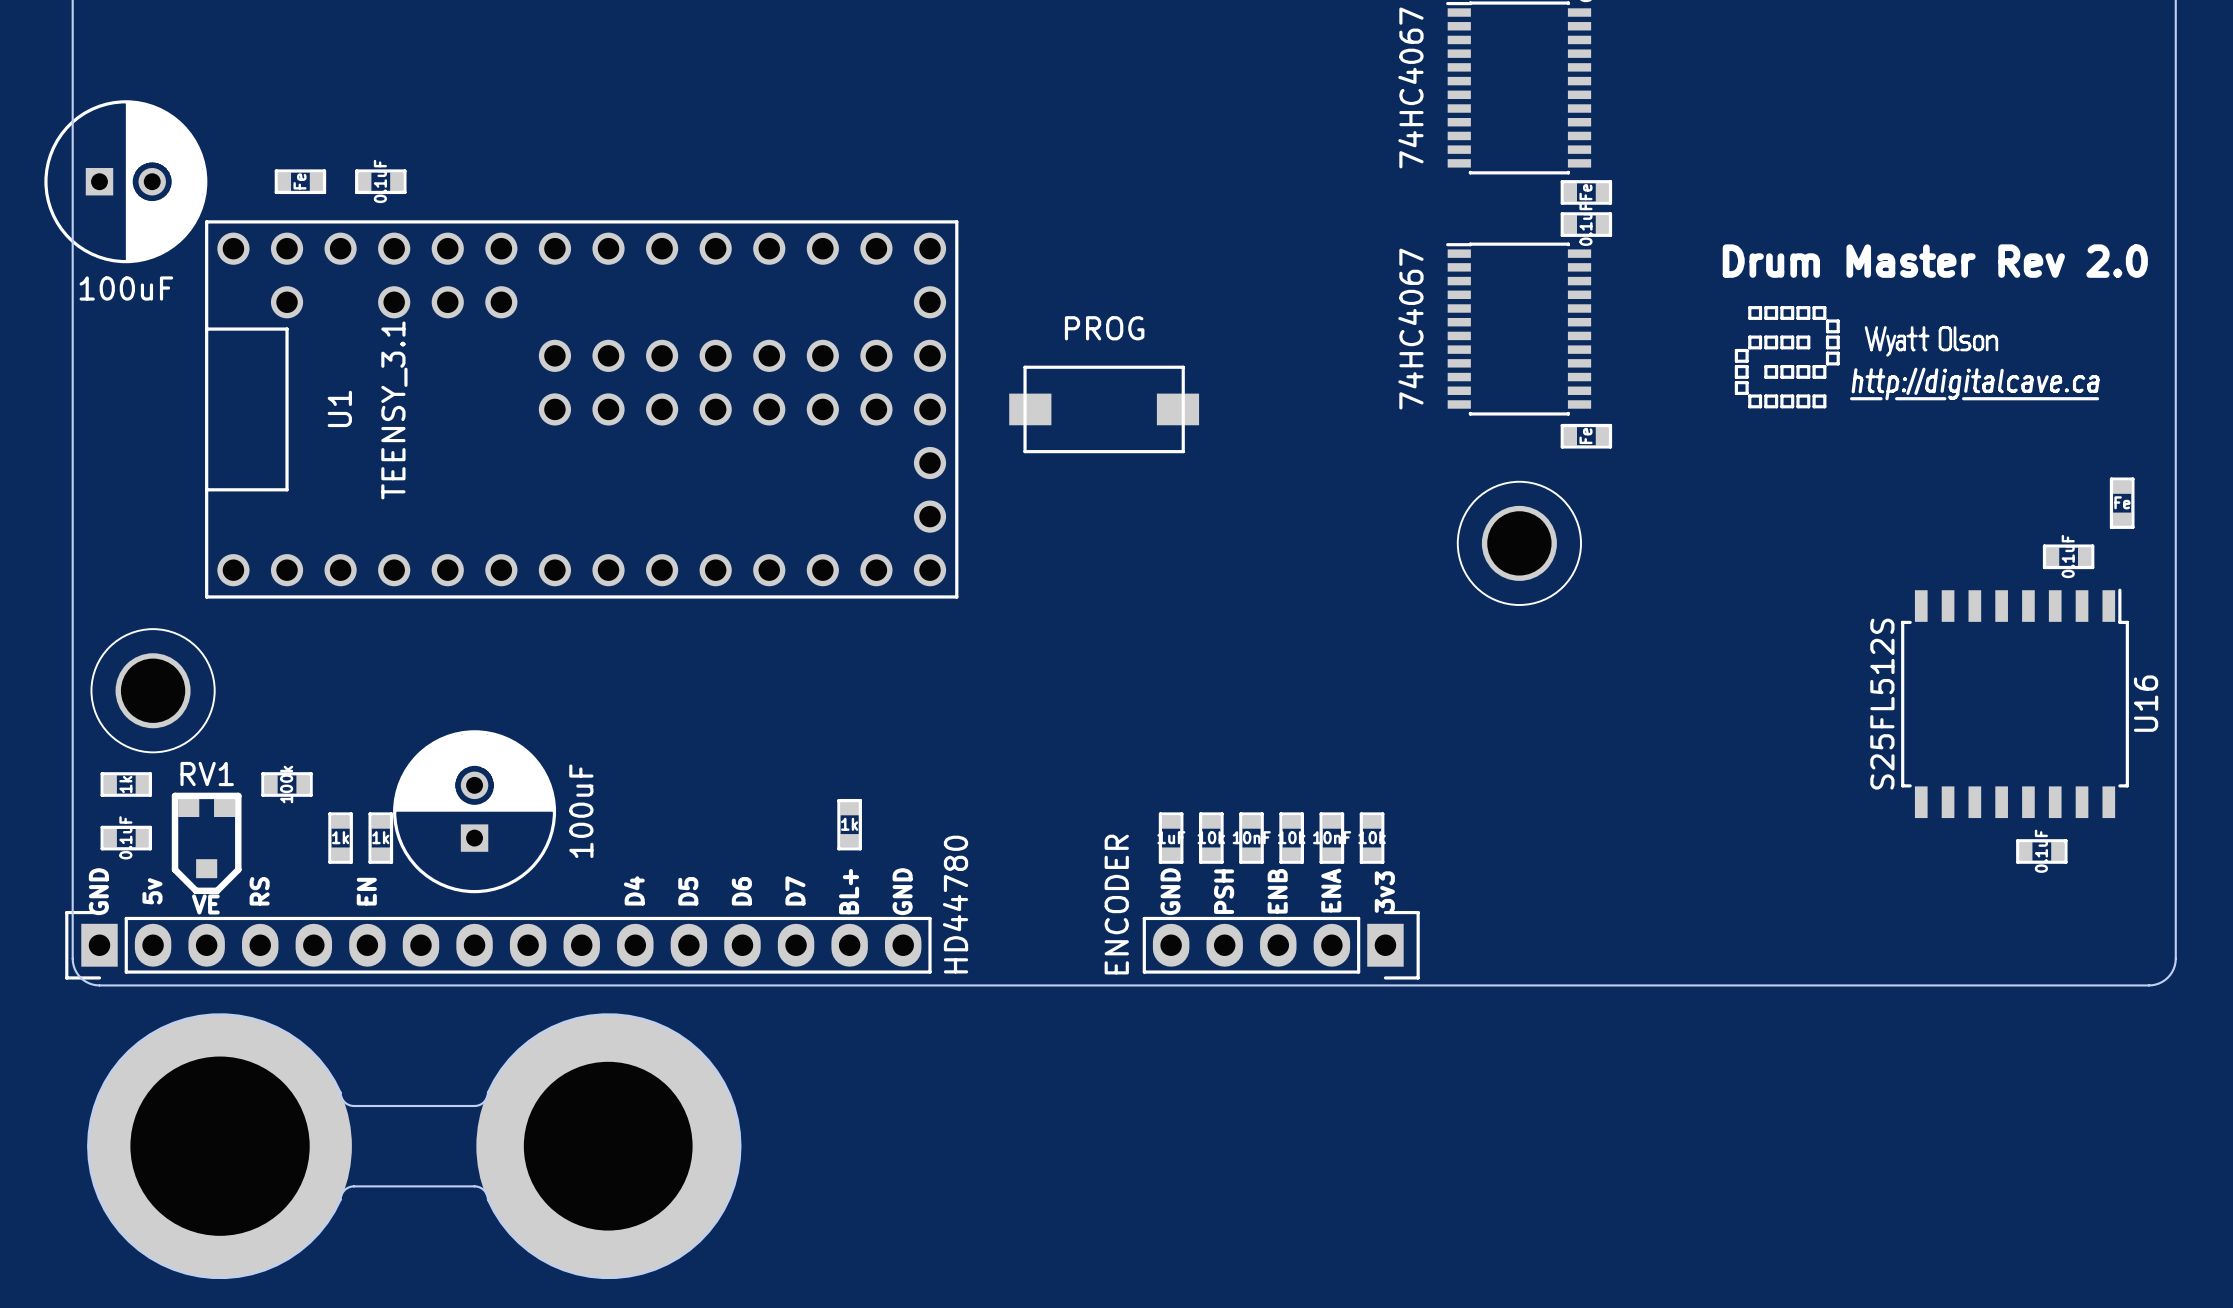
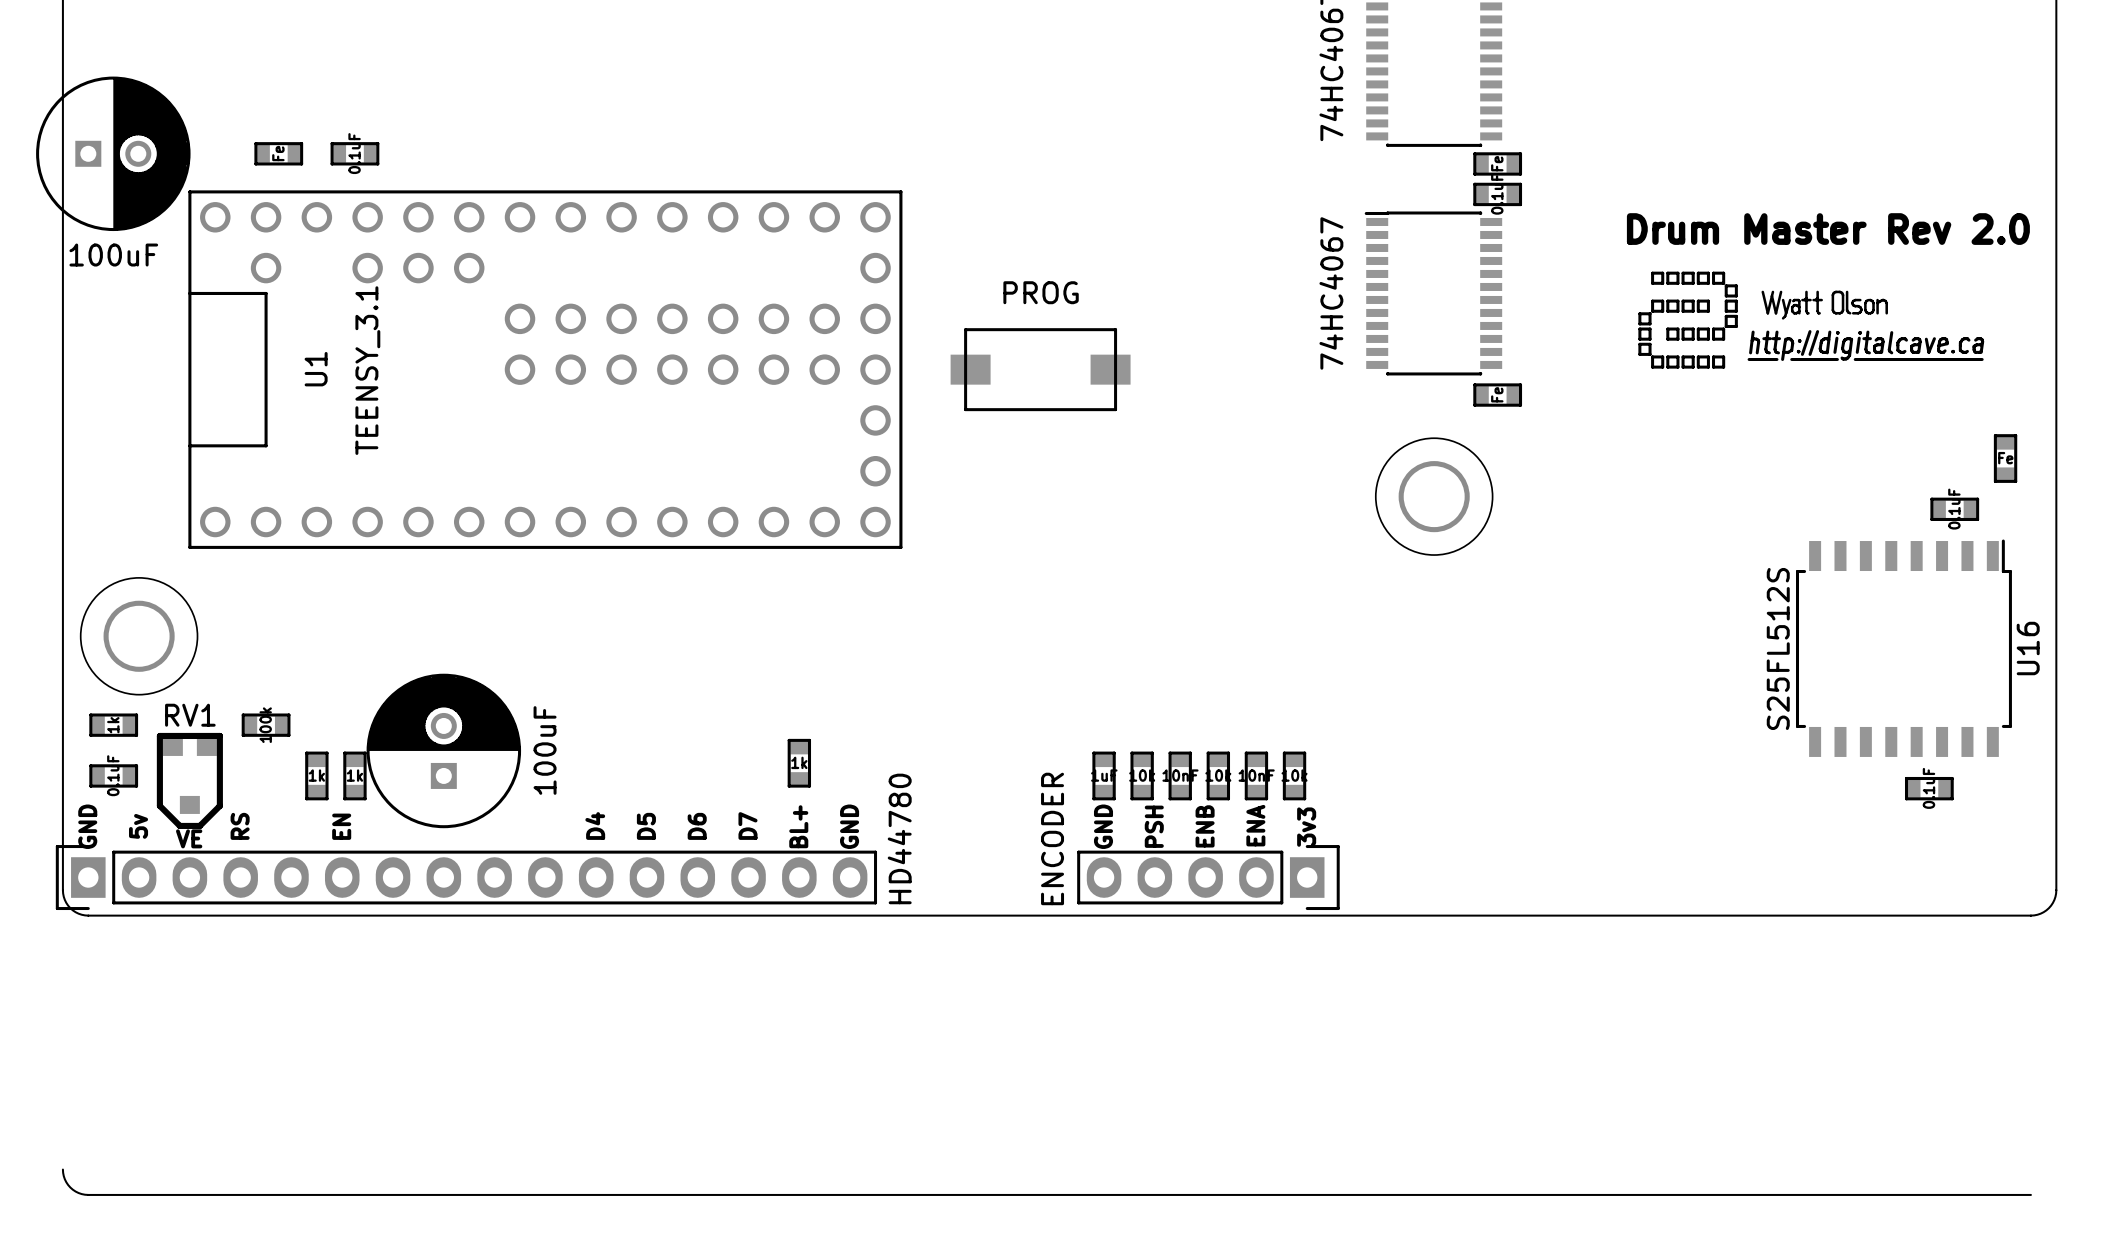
board edge: (340, 1092) (340, 1094) (341, 1096) (343, 1100) (352, 1105) (478, 1105) (485, 1100) (493, 1080) (509, 1059) (539, 1033) (576, 1018) (602, 1014) (629, 1015) (655, 1022) (678, 1034) (699, 1050) (717, 1071) (729, 1094) (737, 1119) (740, 1146) (737, 1172) (729, 1197) (717, 1221) (689, 1250) (655, 1269) (616, 1277) (576, 1274) (539, 1258) (509, 1233) (493, 1211) (485, 1191) (476, 1186) (348, 1187) (342, 1193) (327, 1222) (299, 1251) (264, 1270) (225, 1277) (186, 1273) (149, 1257) (119, 1231) (98, 1197) (90, 1172) (88, 1146) (90, 1119) (98, 1094) (111, 1071) (128, 1050) (161, 1028) (186, 1018) (212, 1014) (238, 1015) (264, 1022) (288, 1033) (309, 1049) (327, 1069) (334, 1080) (340, 1092) -> none
part: (220, 1146) -> none
part: (608, 1146) -> none
board edge: none -> (62, 1169) (64, 1179) (70, 1187) (78, 1193) (88, 1194) (2030, 1194)

